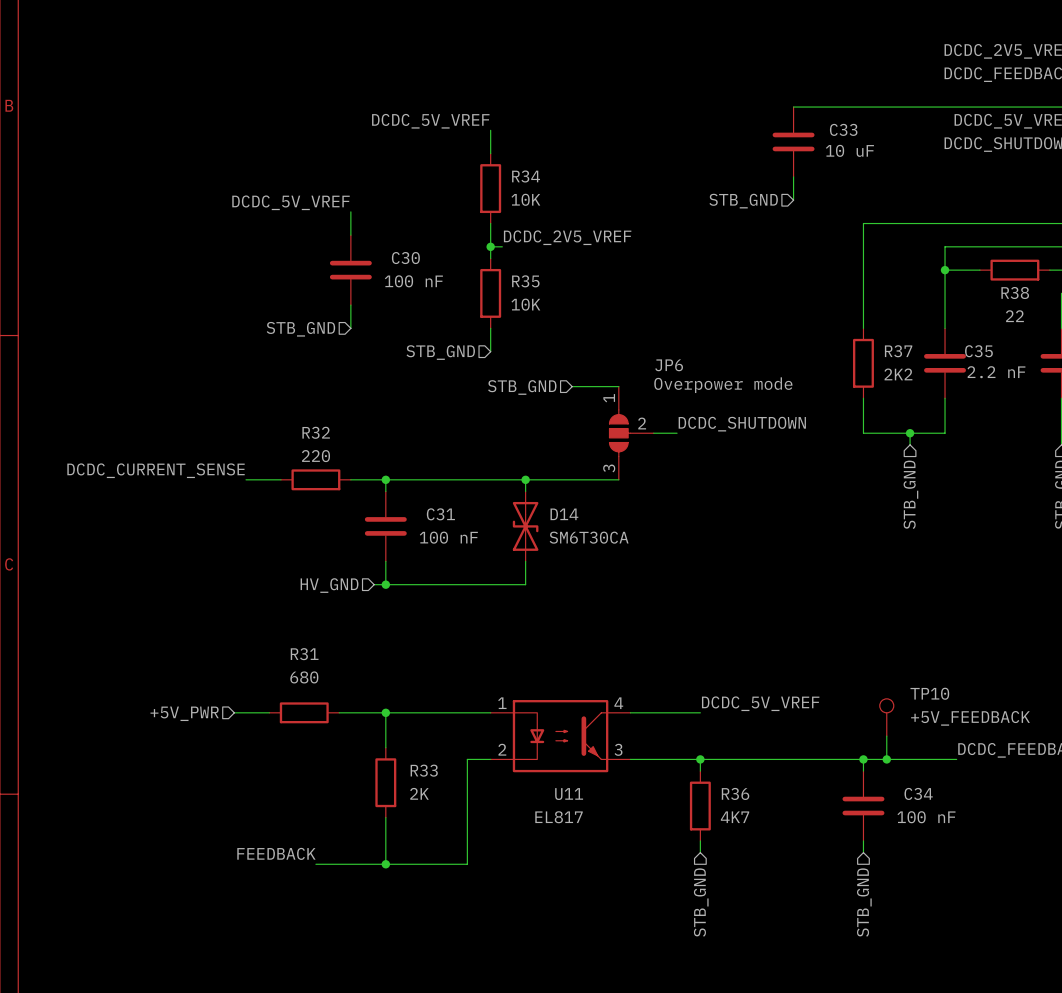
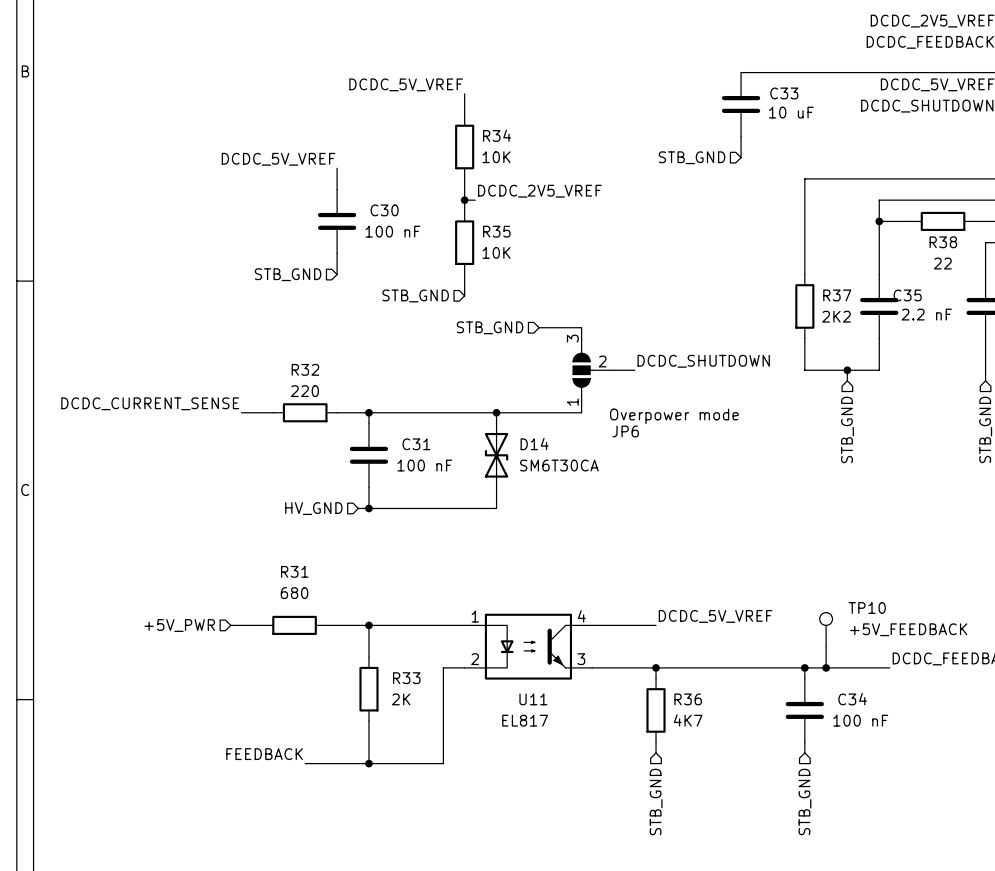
JP6 flip: as is (619, 433) -> up-down (582, 370)

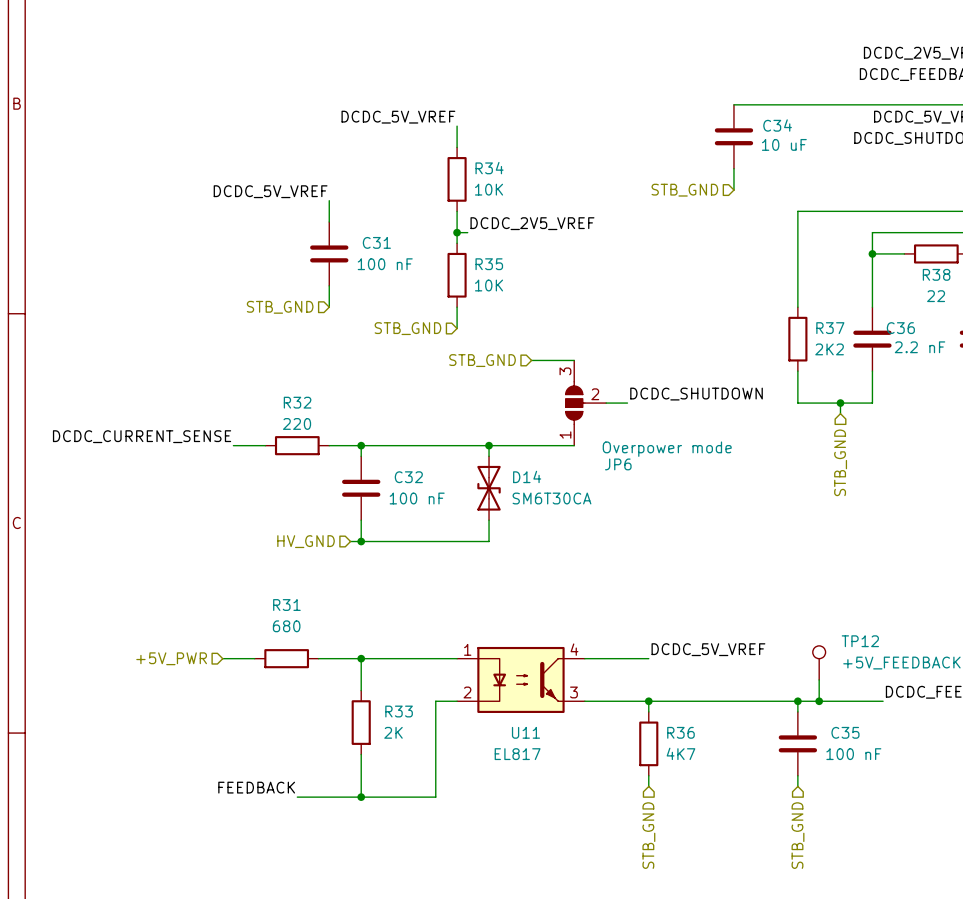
C33 name: C33 (784, 93) -> C34 (777, 125)
C30 name: C30 (384, 210) -> C31 (376, 242)
C35 name: C35 (907, 295) -> C36 (900, 328)
C31 name: C31 (416, 444) -> C32 (408, 477)
TP10 name: TP10 (867, 607) -> TP12 (860, 641)
C34 name: C34 (852, 699) -> C35 (845, 732)

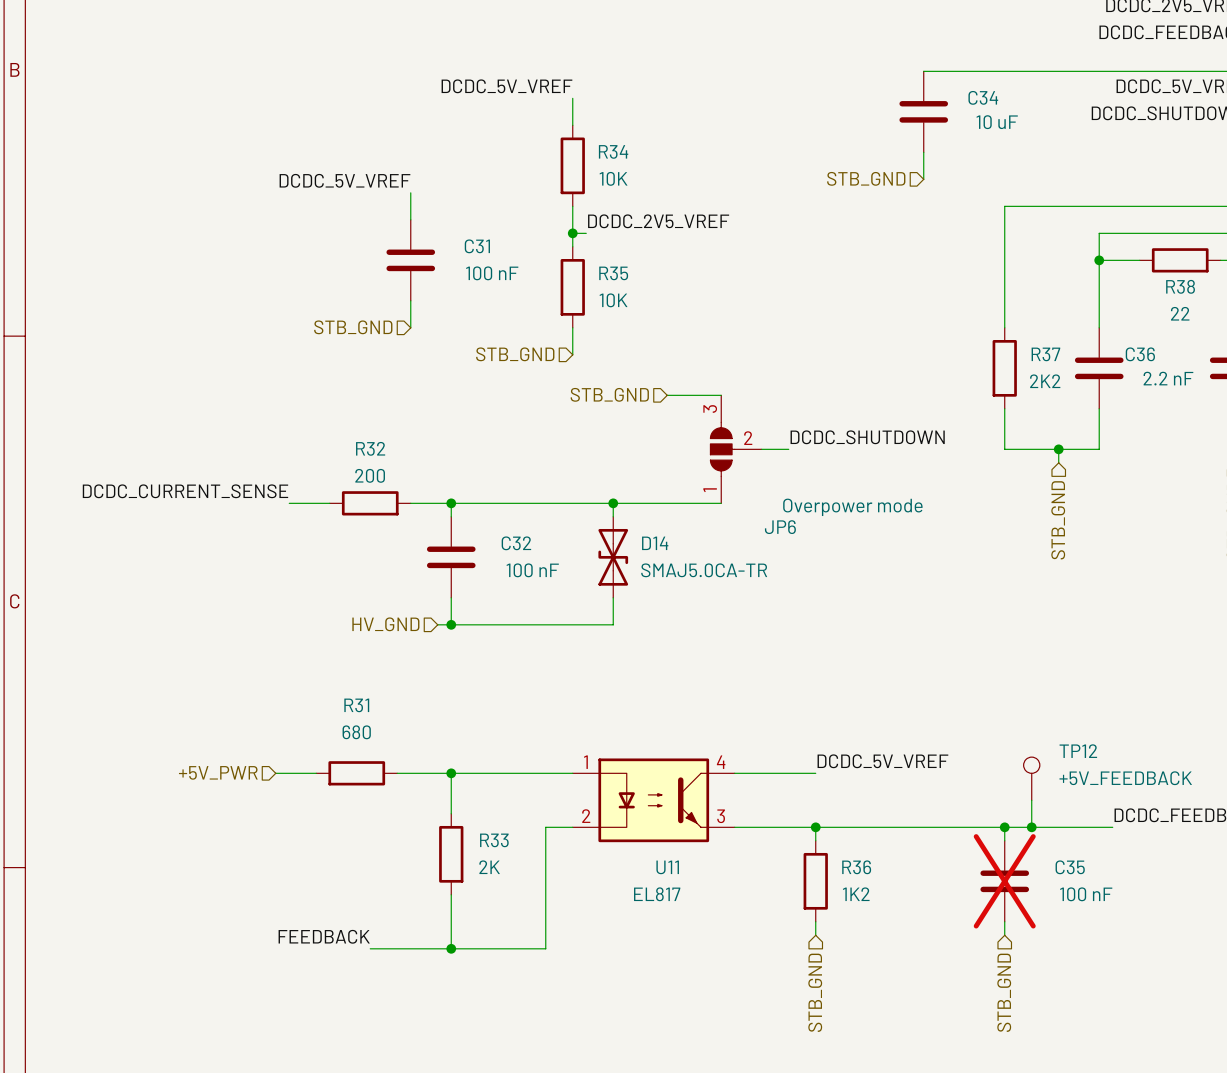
R32 value: 220 (297, 423) -> 200 (370, 475)
D14 value: SM6T30CA (551, 498) -> SMAJ5.0CA-TR (704, 570)
C35 do-not-place cross: none -> (1004, 881)
R36 value: 4K7 (680, 753) -> 1K2 (856, 894)

